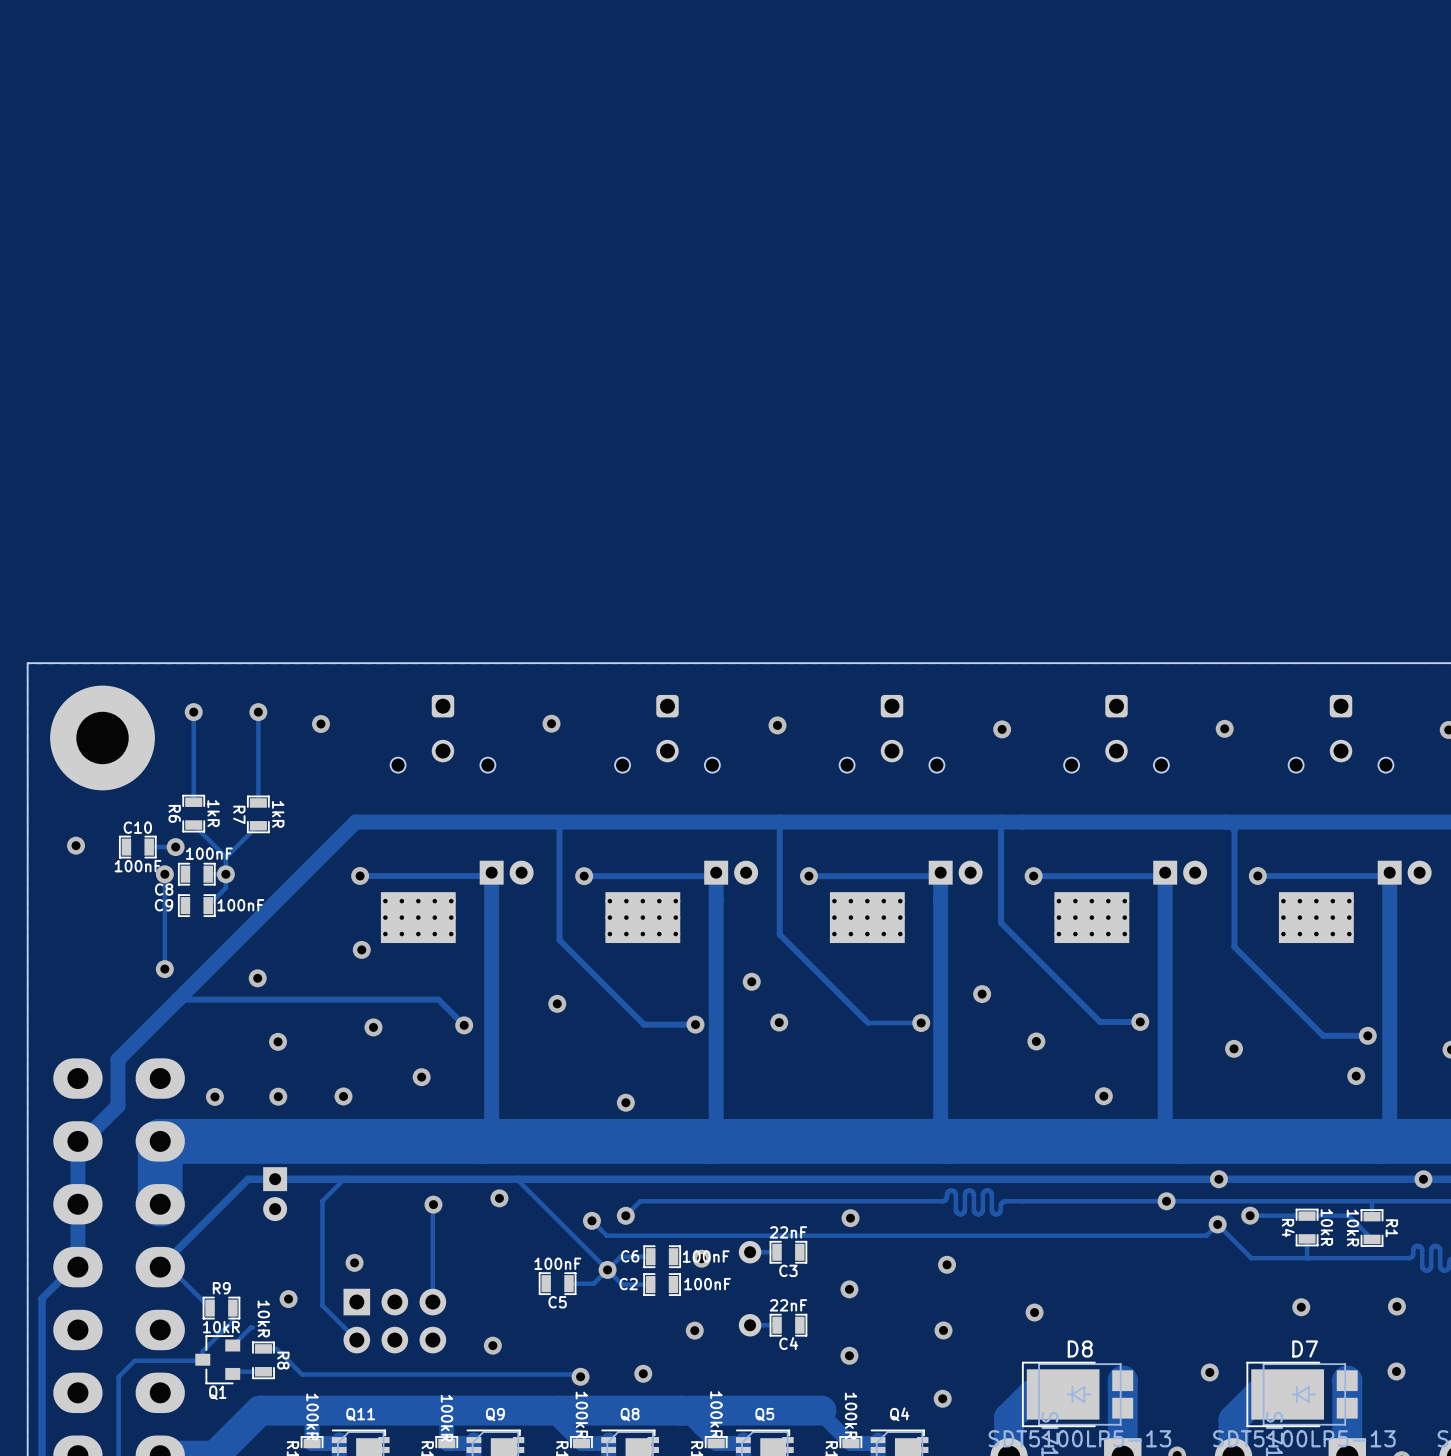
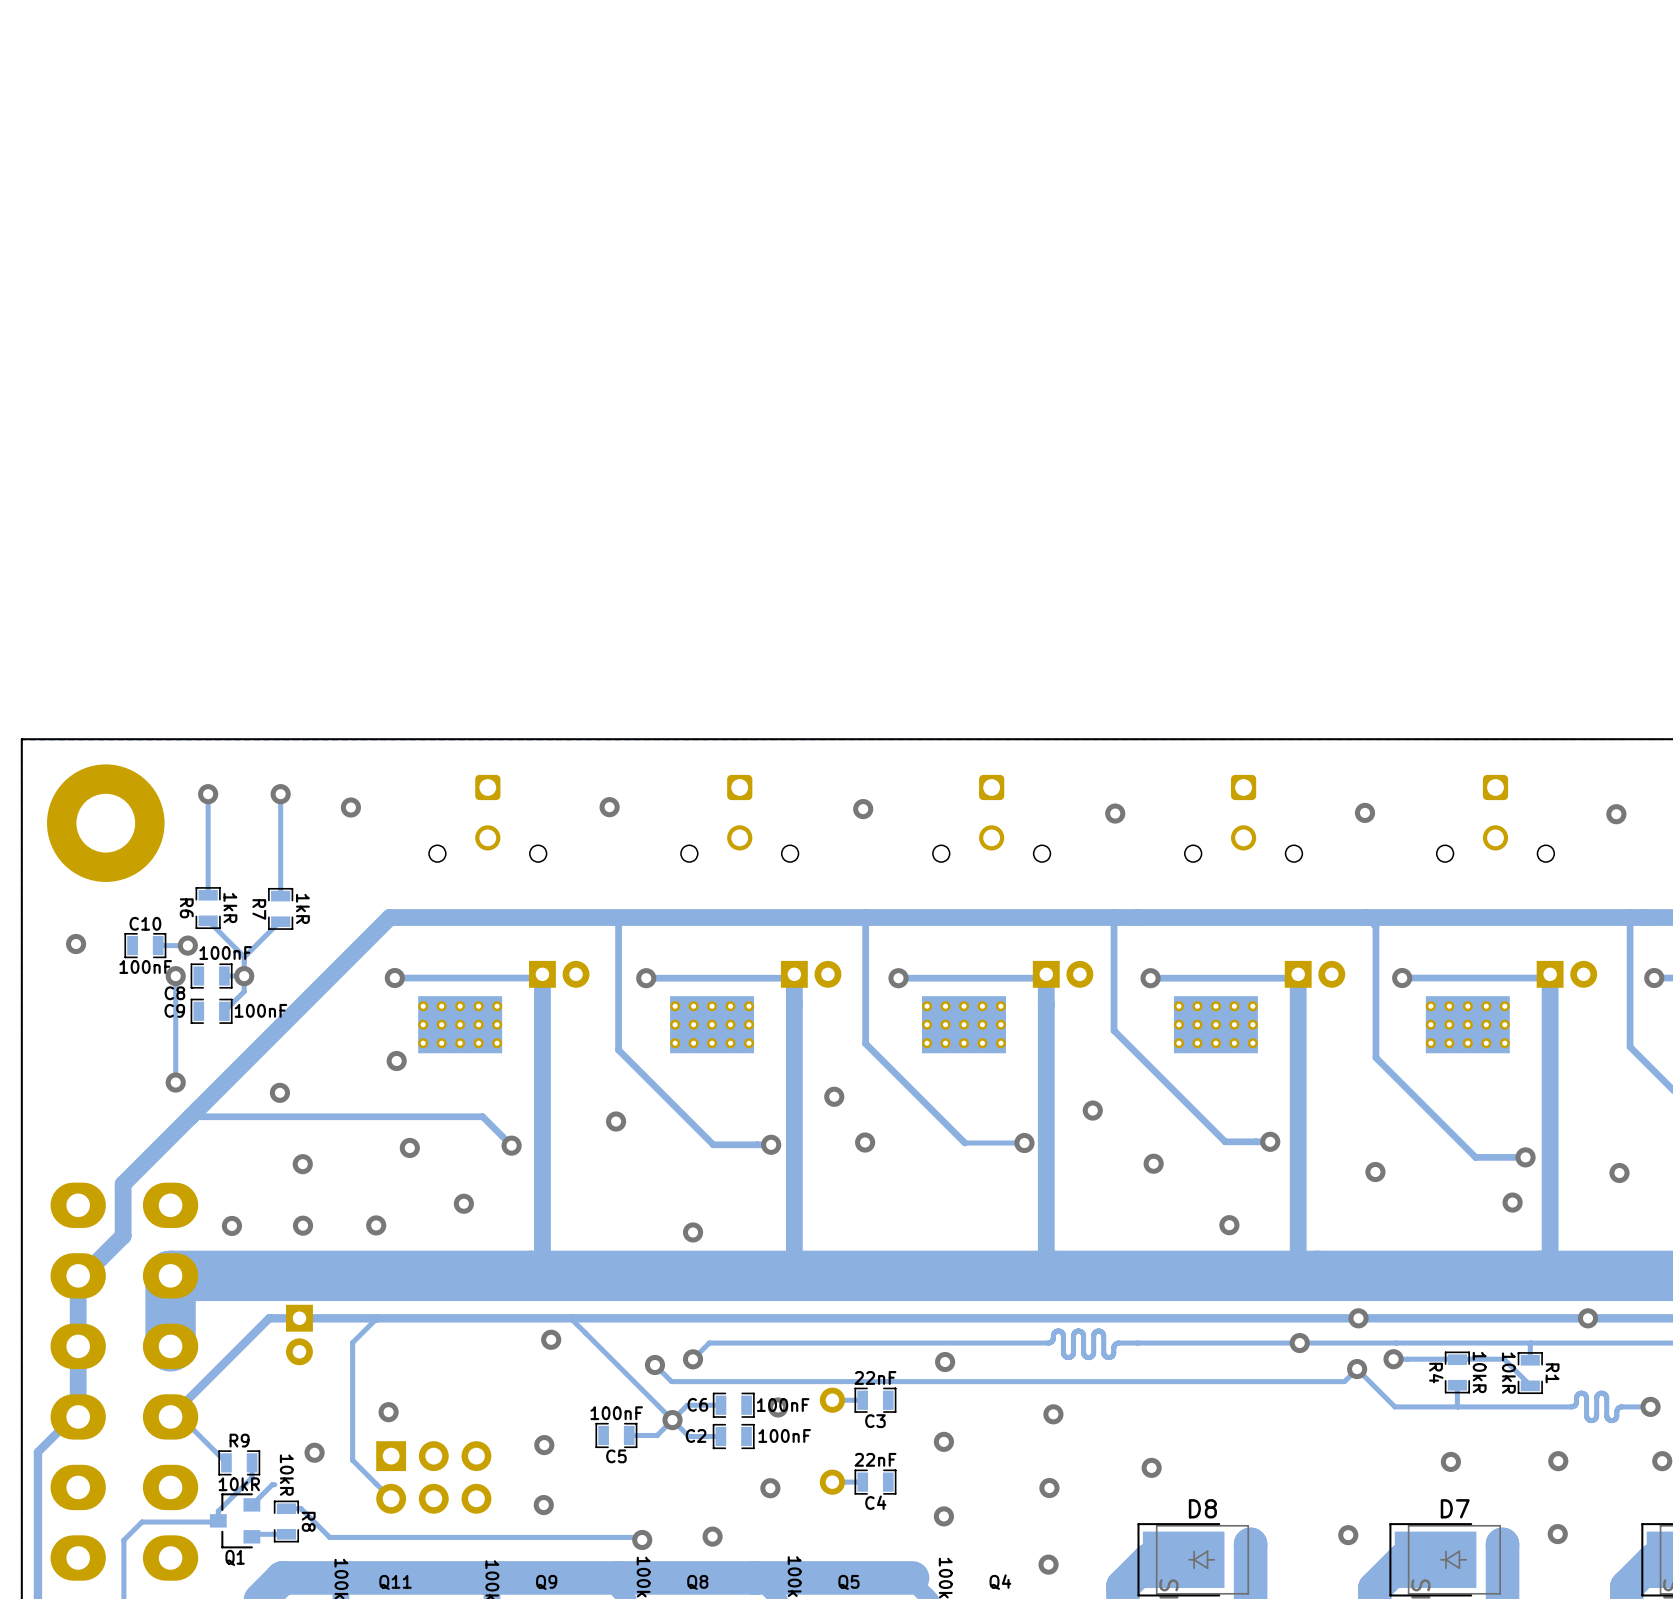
track: (433, 1204) (432, 1302) -> none
via: (433, 1204) -> none
via: none -> (544, 1445)

